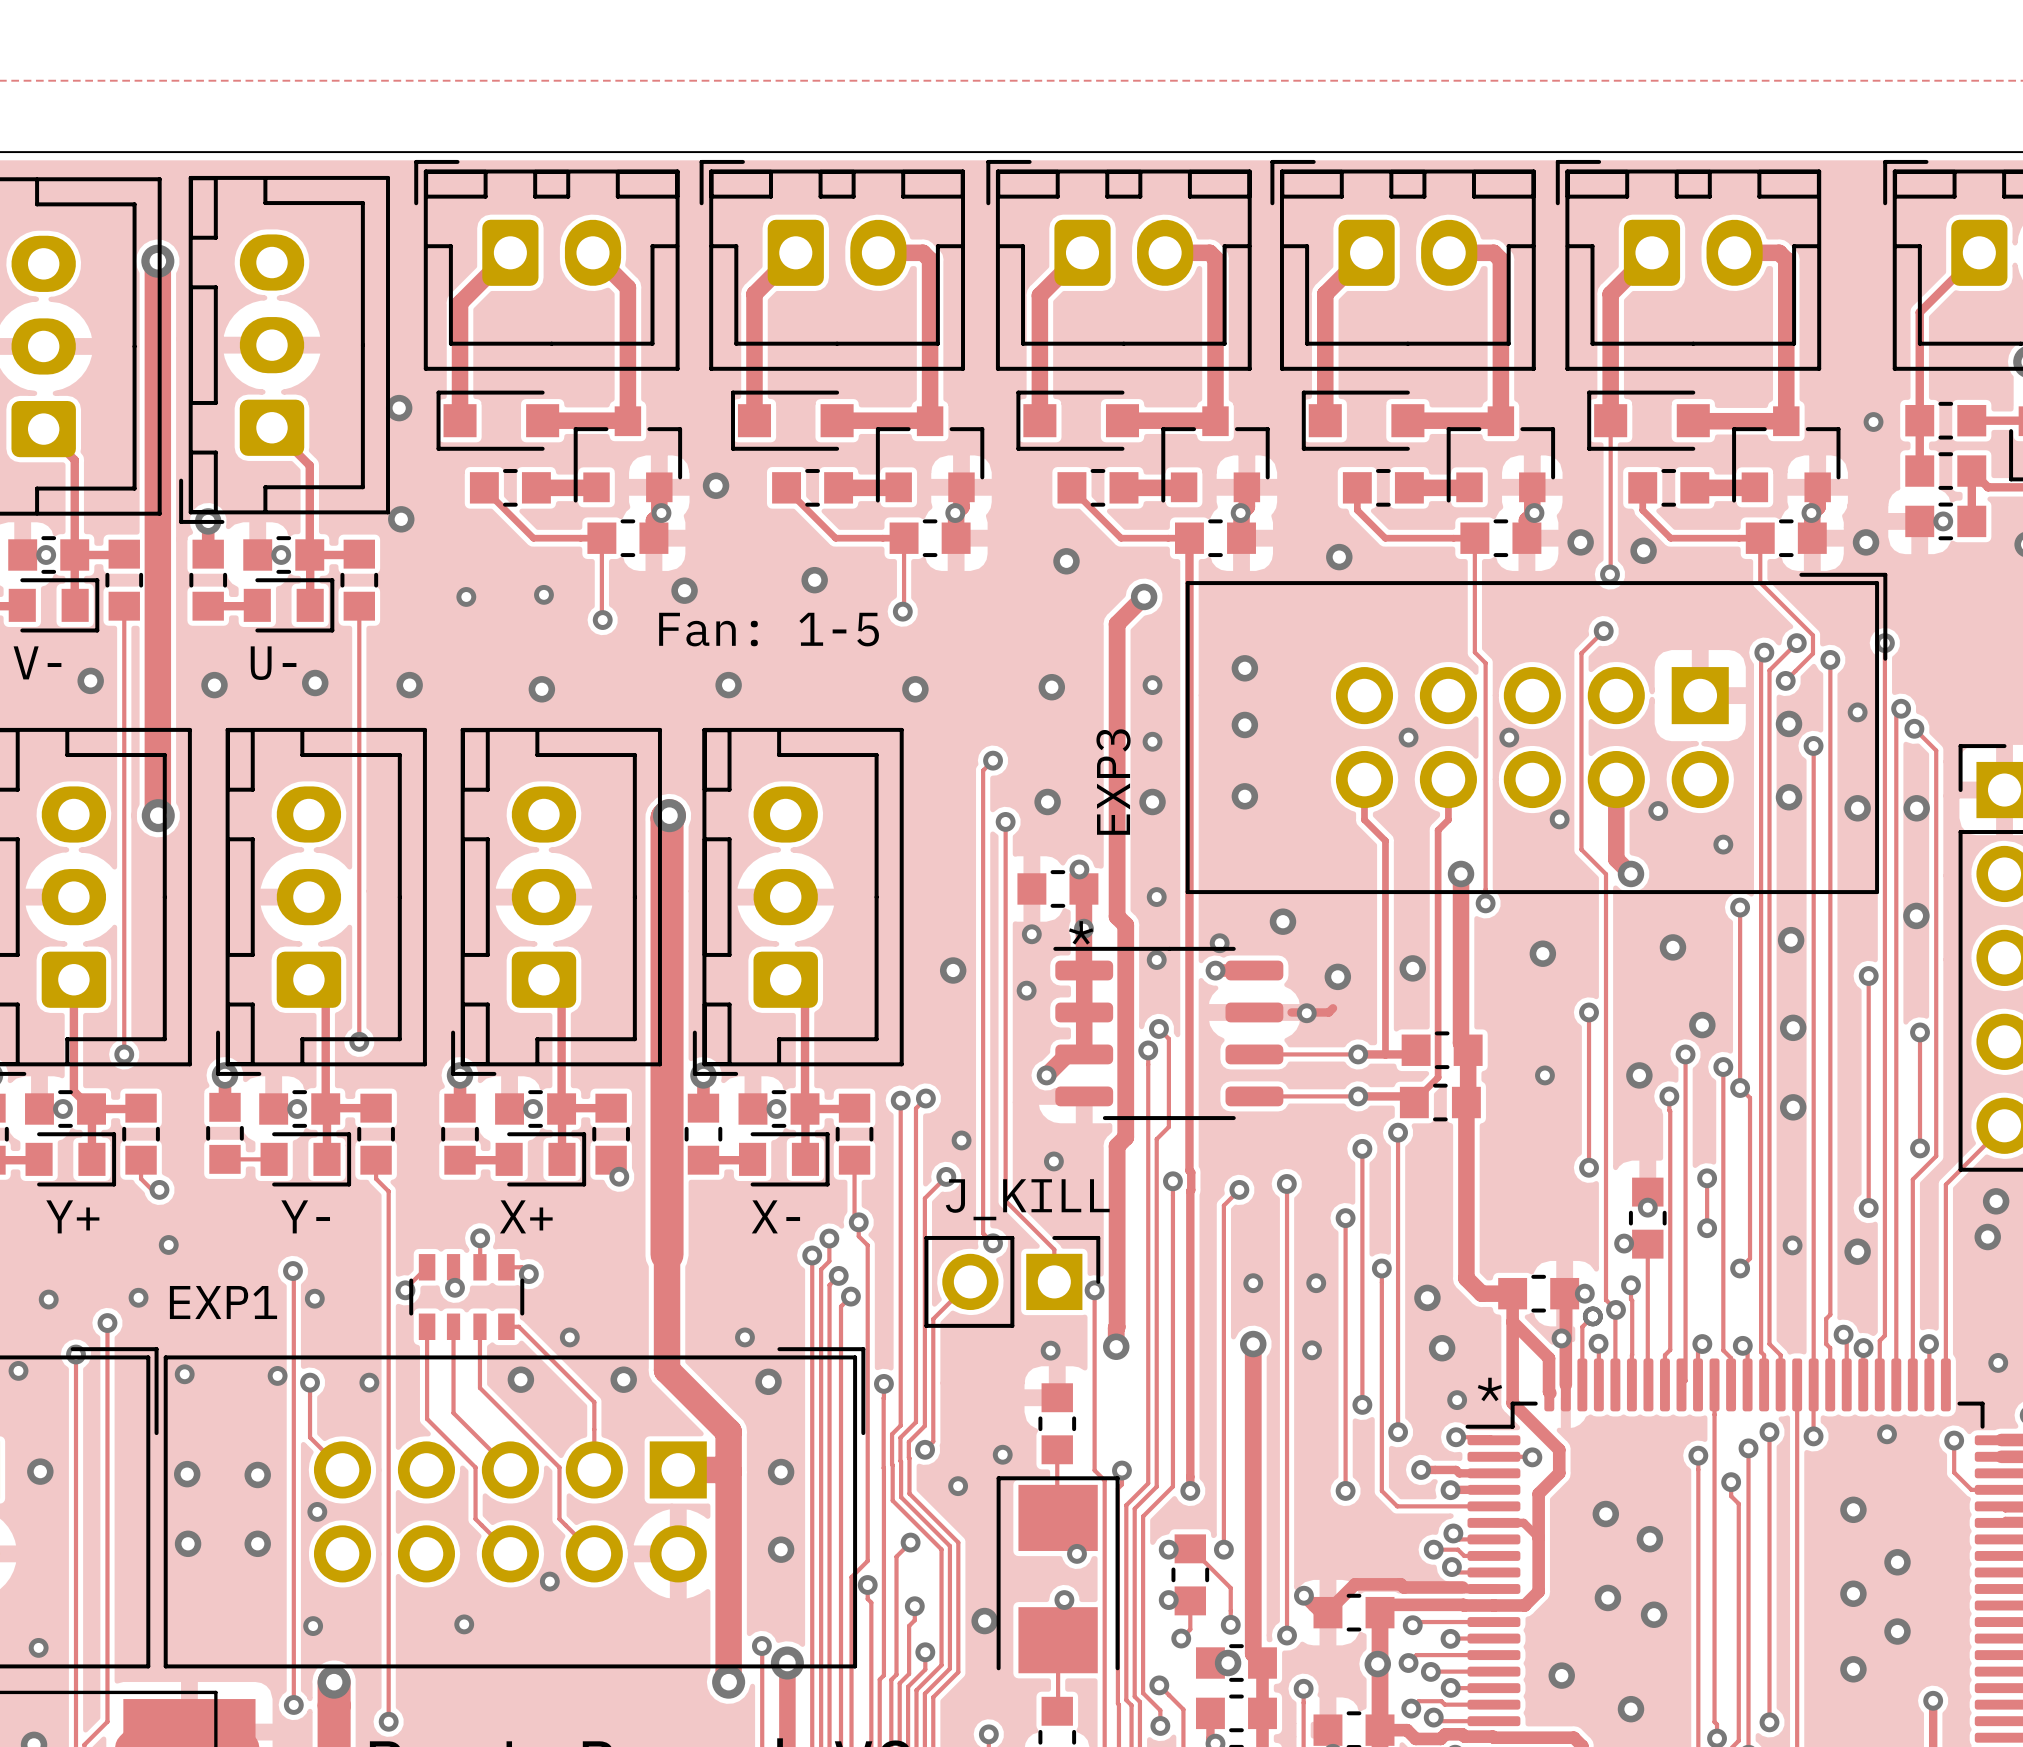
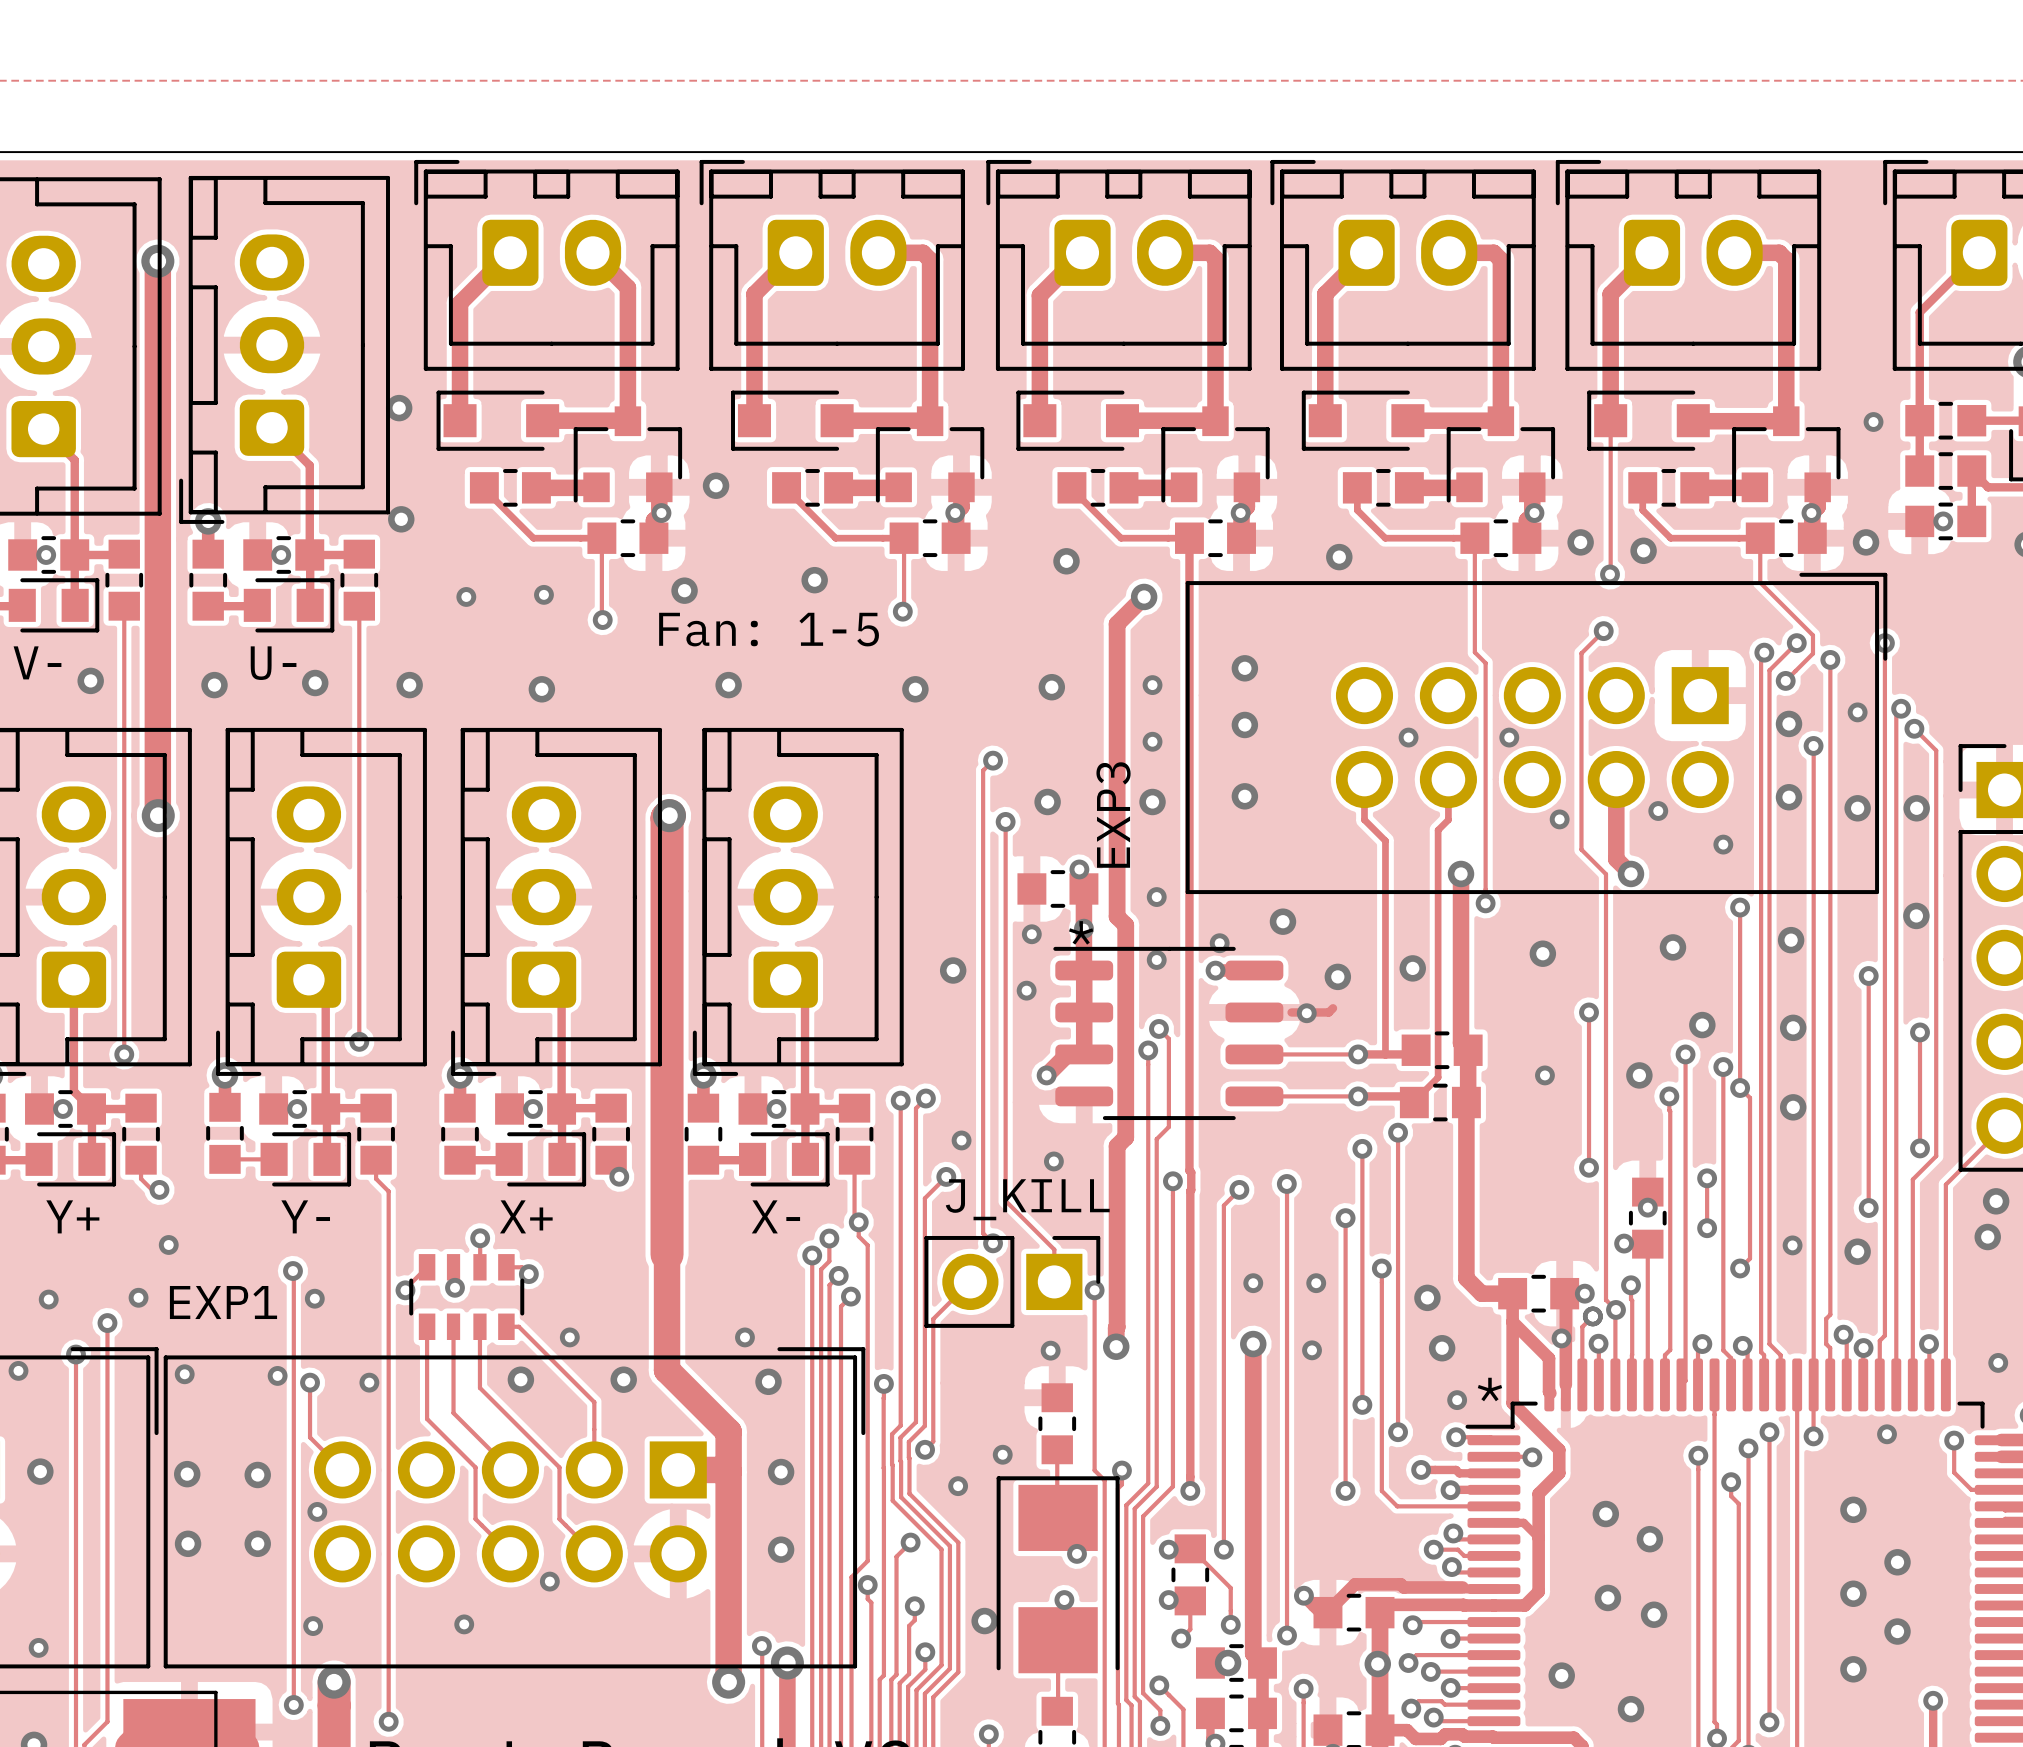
text position: EXP3 (1113, 782) -> EXP3 (1113, 815)

